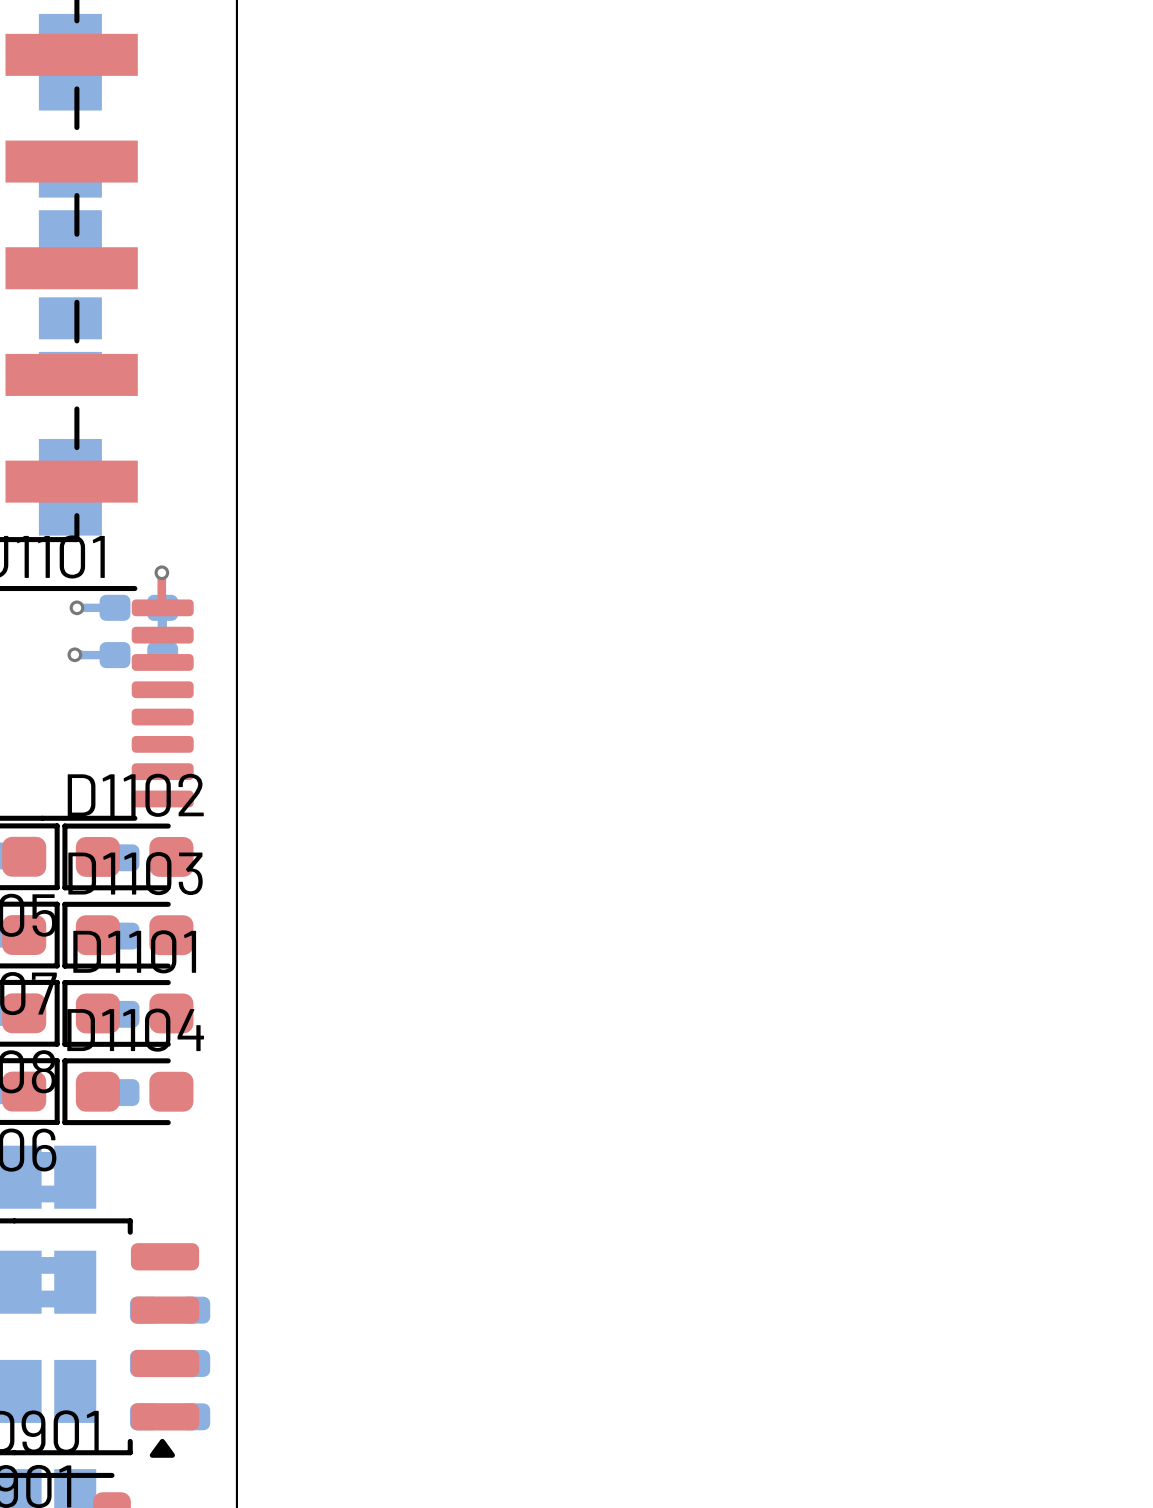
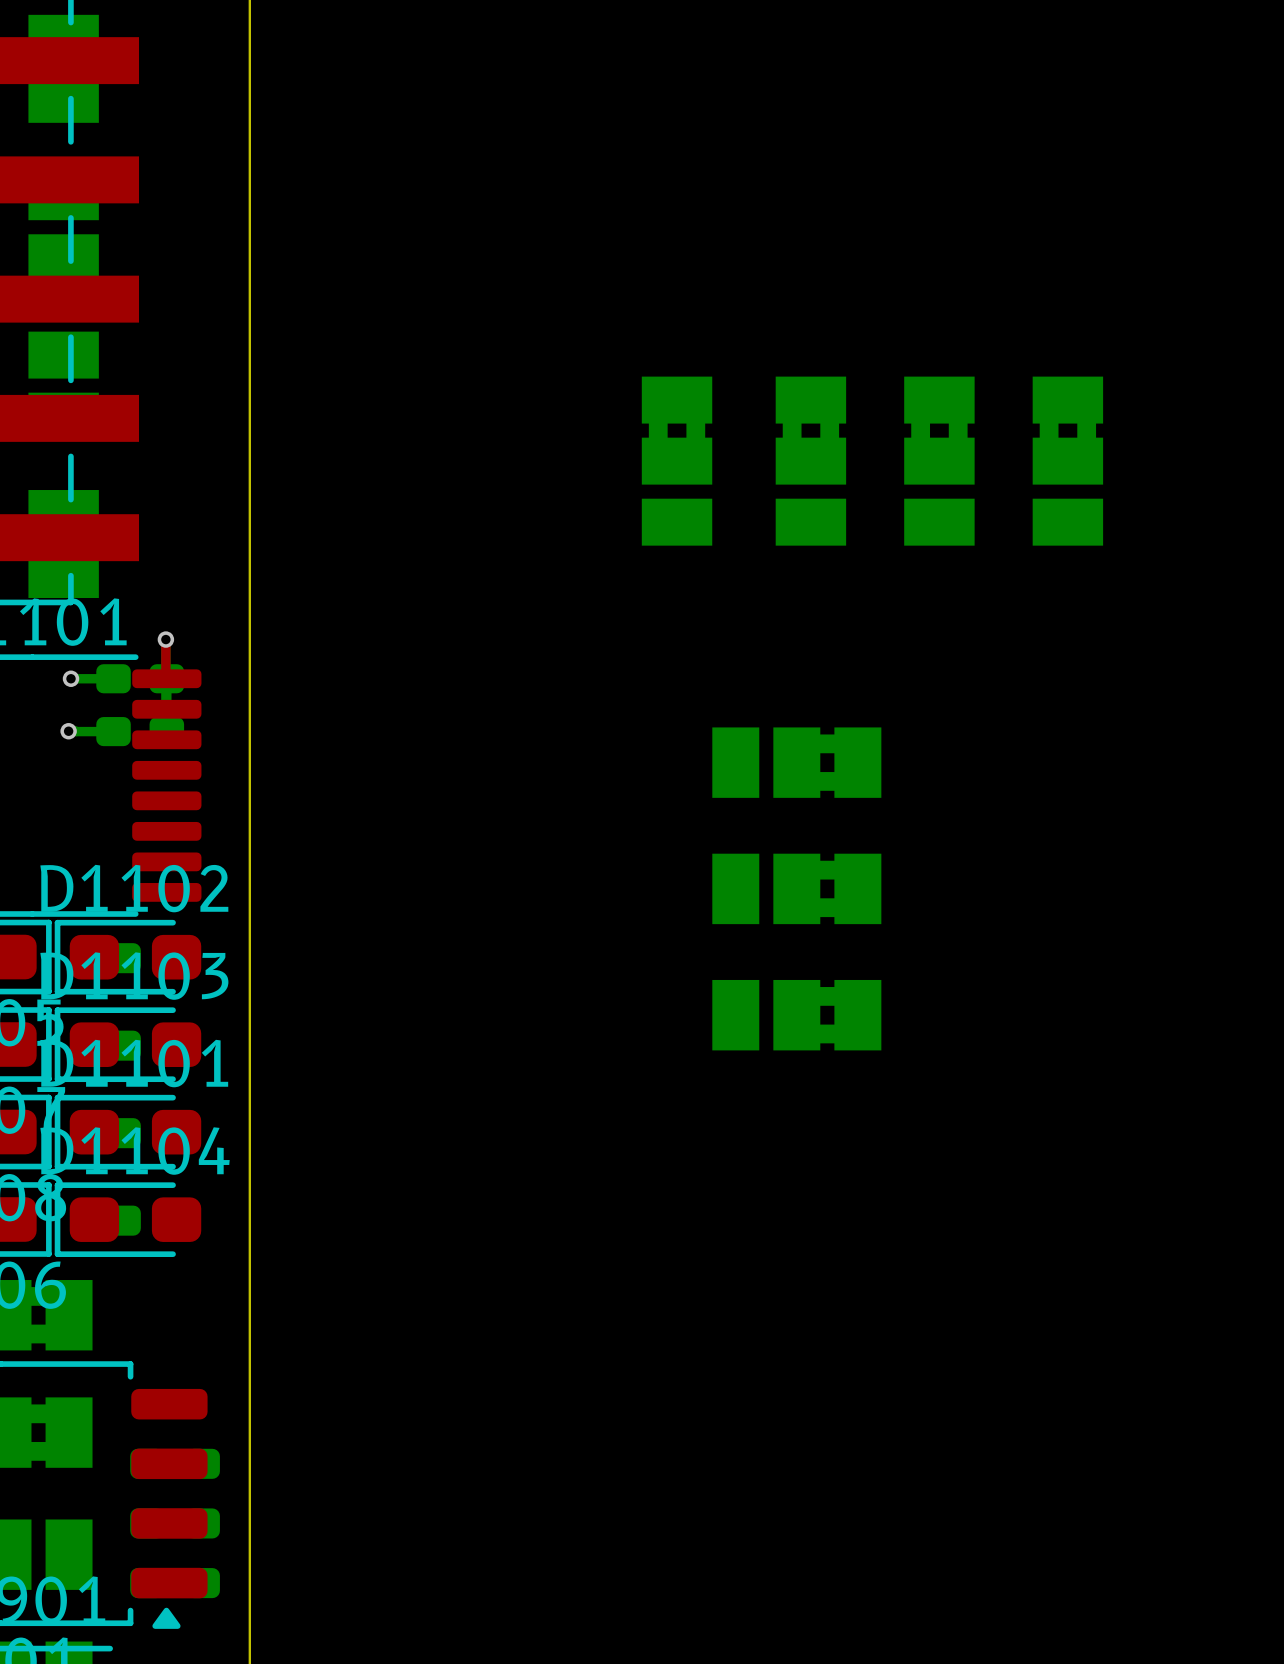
part: none -> (677, 461)
part: none -> (810, 461)
part: none -> (939, 461)
part: none -> (1067, 461)
part: none -> (796, 762)
part: none -> (796, 888)
part: none -> (796, 1015)

